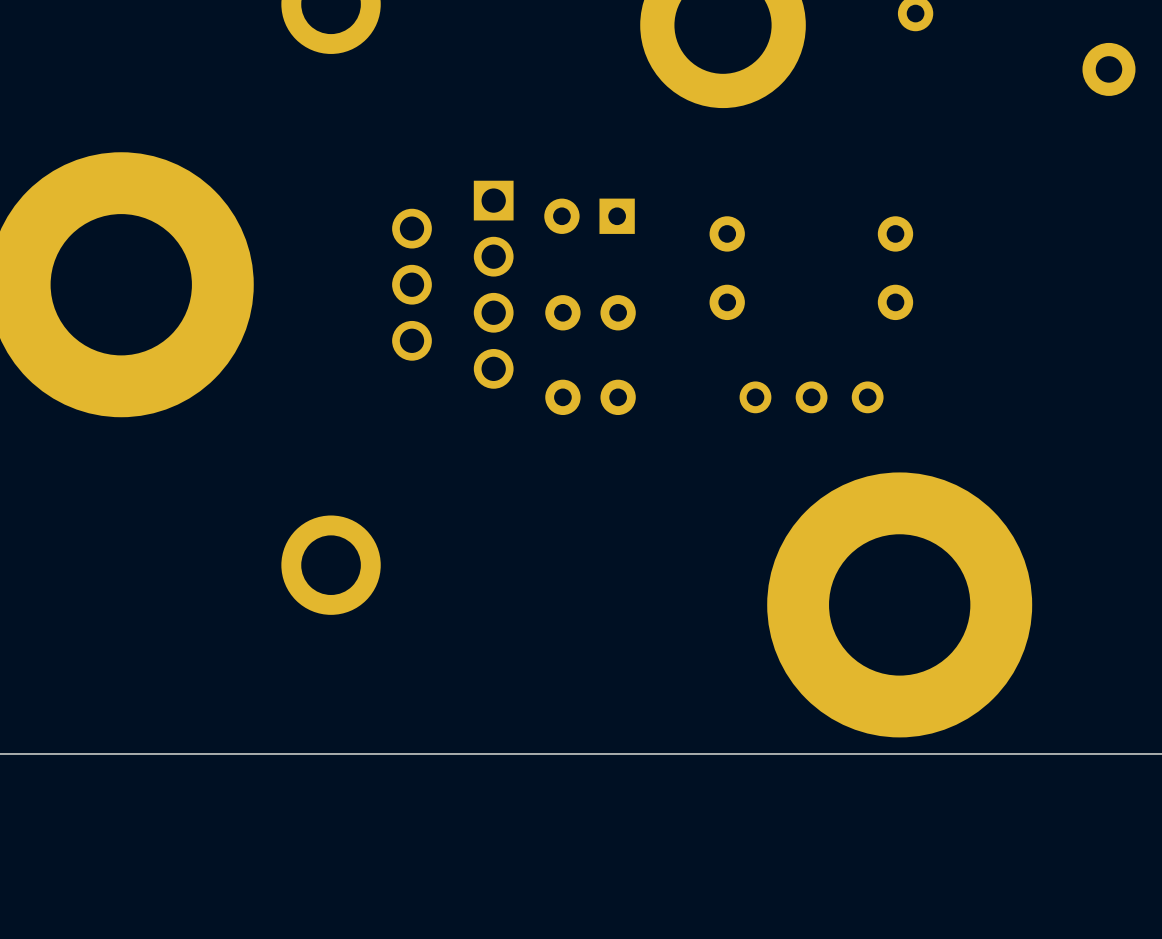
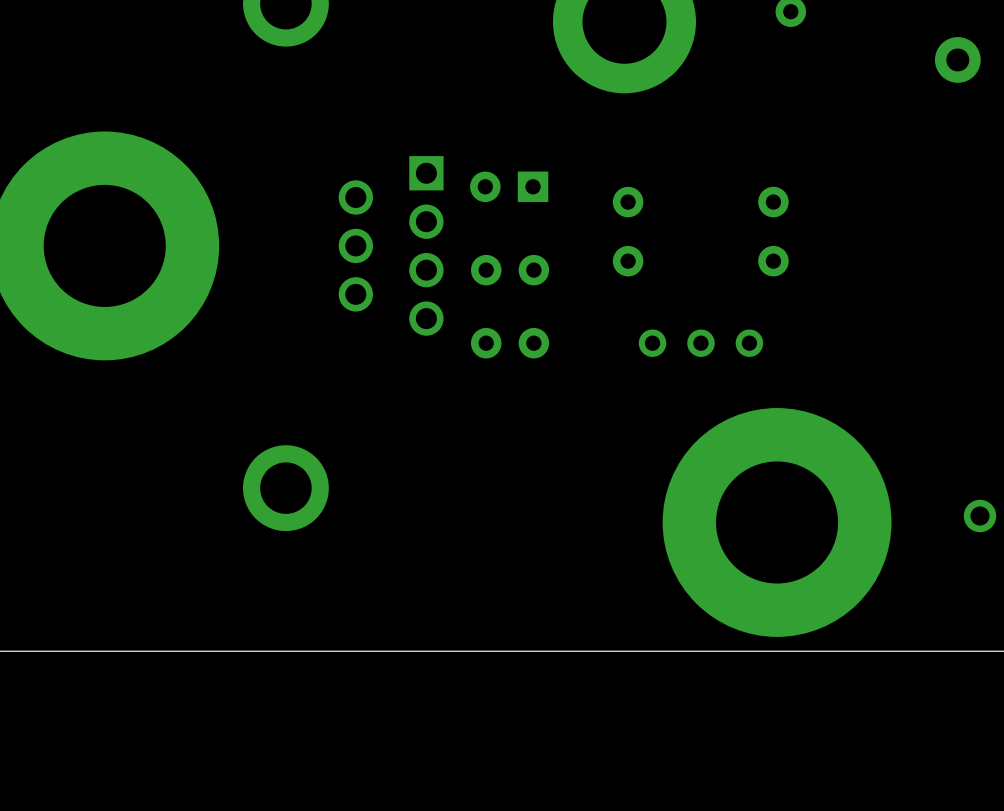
part: none -> (980, 516)

